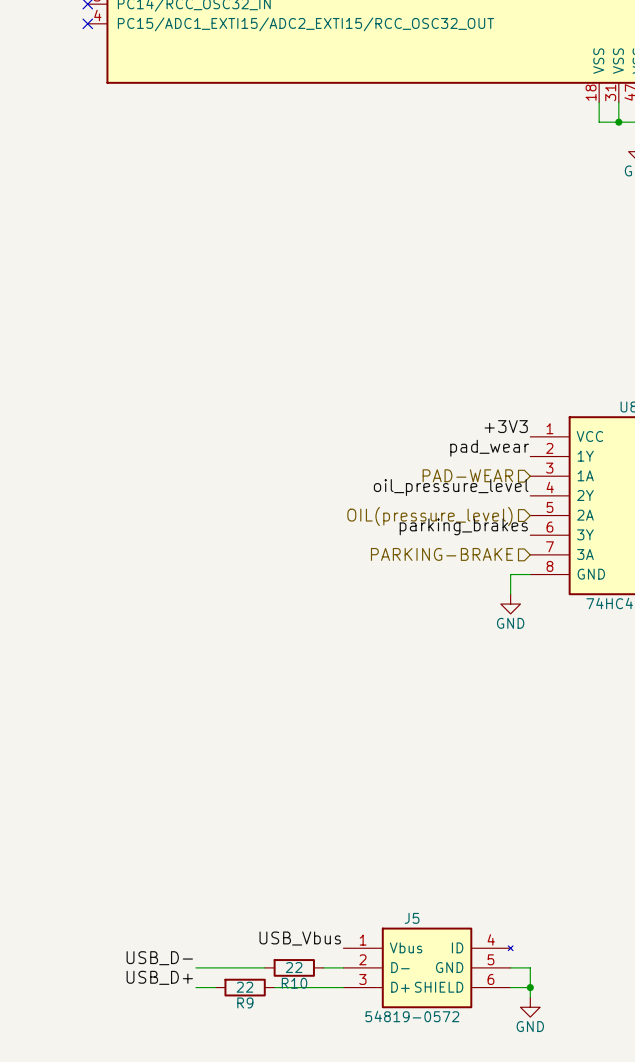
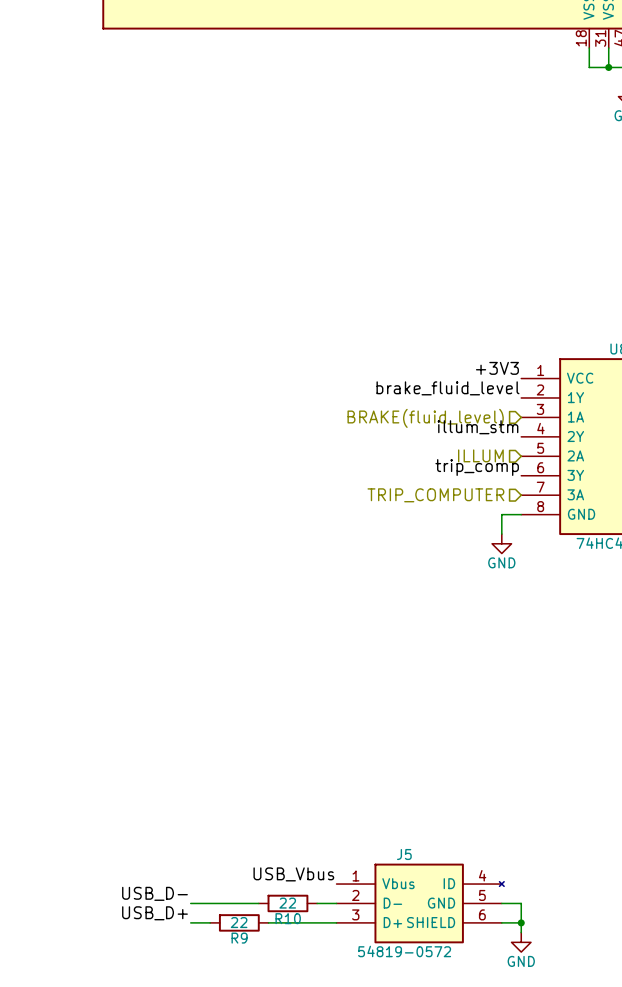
label: pad_wear (489, 448) -> brake_fluid_level (447, 388)
hierarchical label: PAD-WEAR (467, 475) -> BRAKE(fluid_level) (425, 418)
label: oil_pressure_level (451, 487) -> illum_stm (477, 427)
hierarchical label: OIL(pressure_level) (429, 516) -> ILLUM (480, 455)
label: parking_brakes (463, 526) -> trip_comp (477, 467)
hierarchical label: PARKING-BRAKE (442, 554) -> TRIP_COMPUTER (435, 495)

